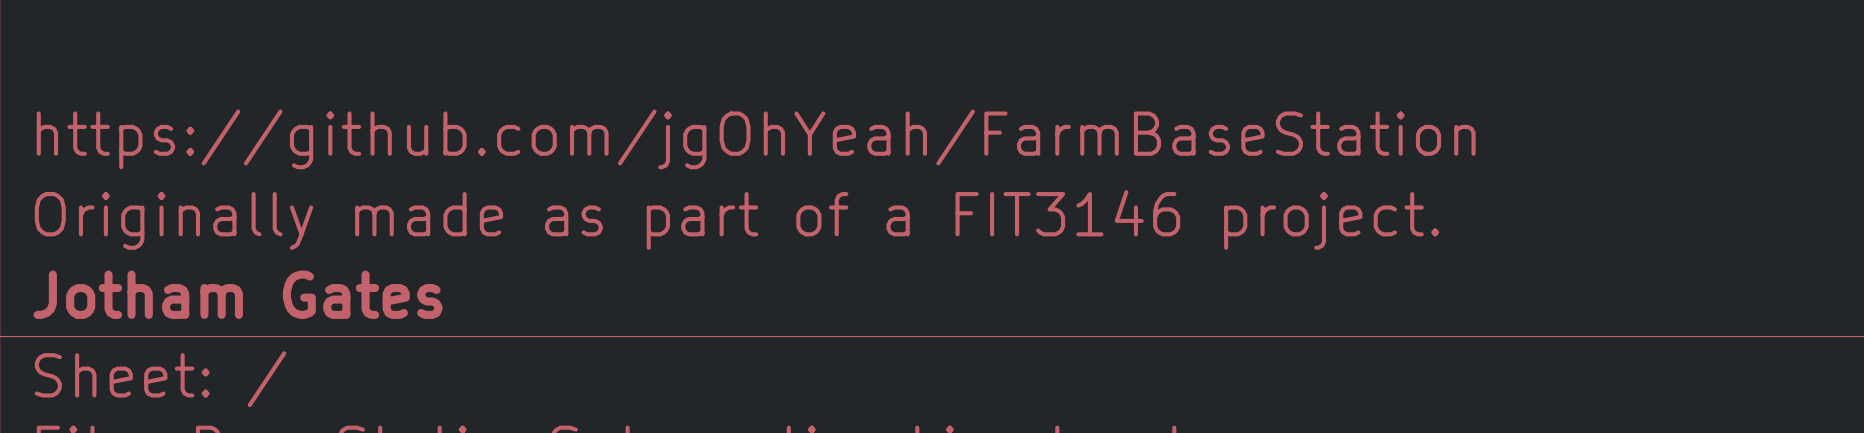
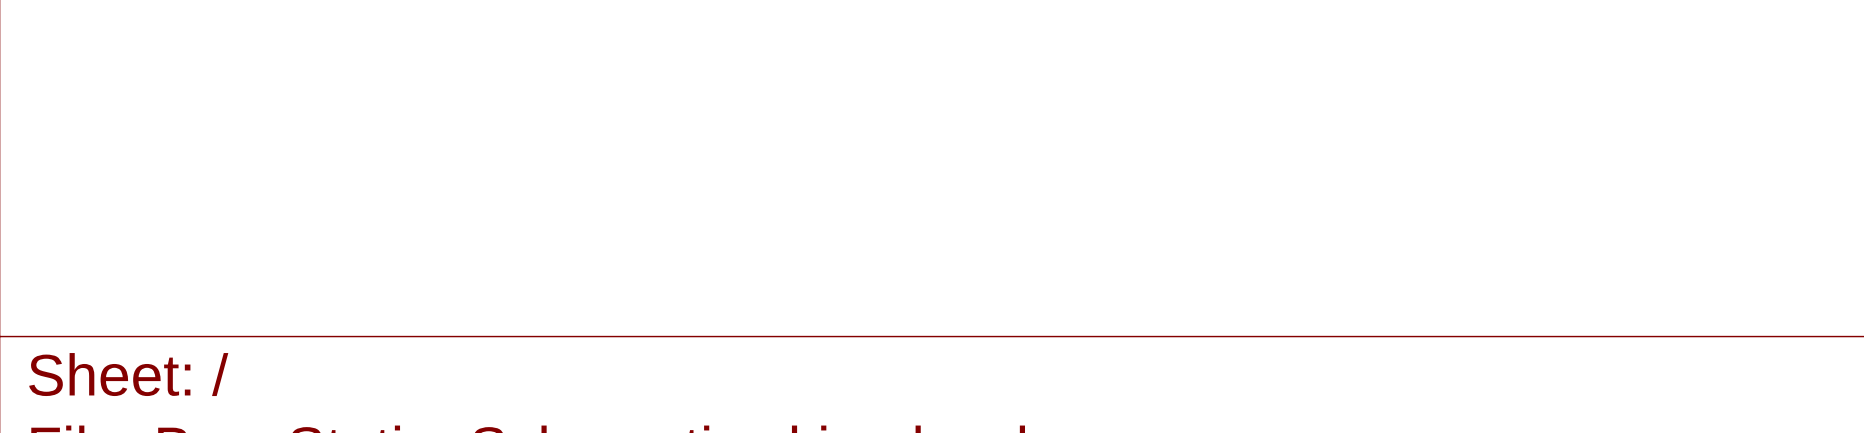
title block: https://github.com/jgOhYeah/FarmBaseStation (756, 139) -> none
title block: Originally made as part of a FIT3146 project. (736, 219) -> none
title block: Jotham Gates (237, 294) -> none

